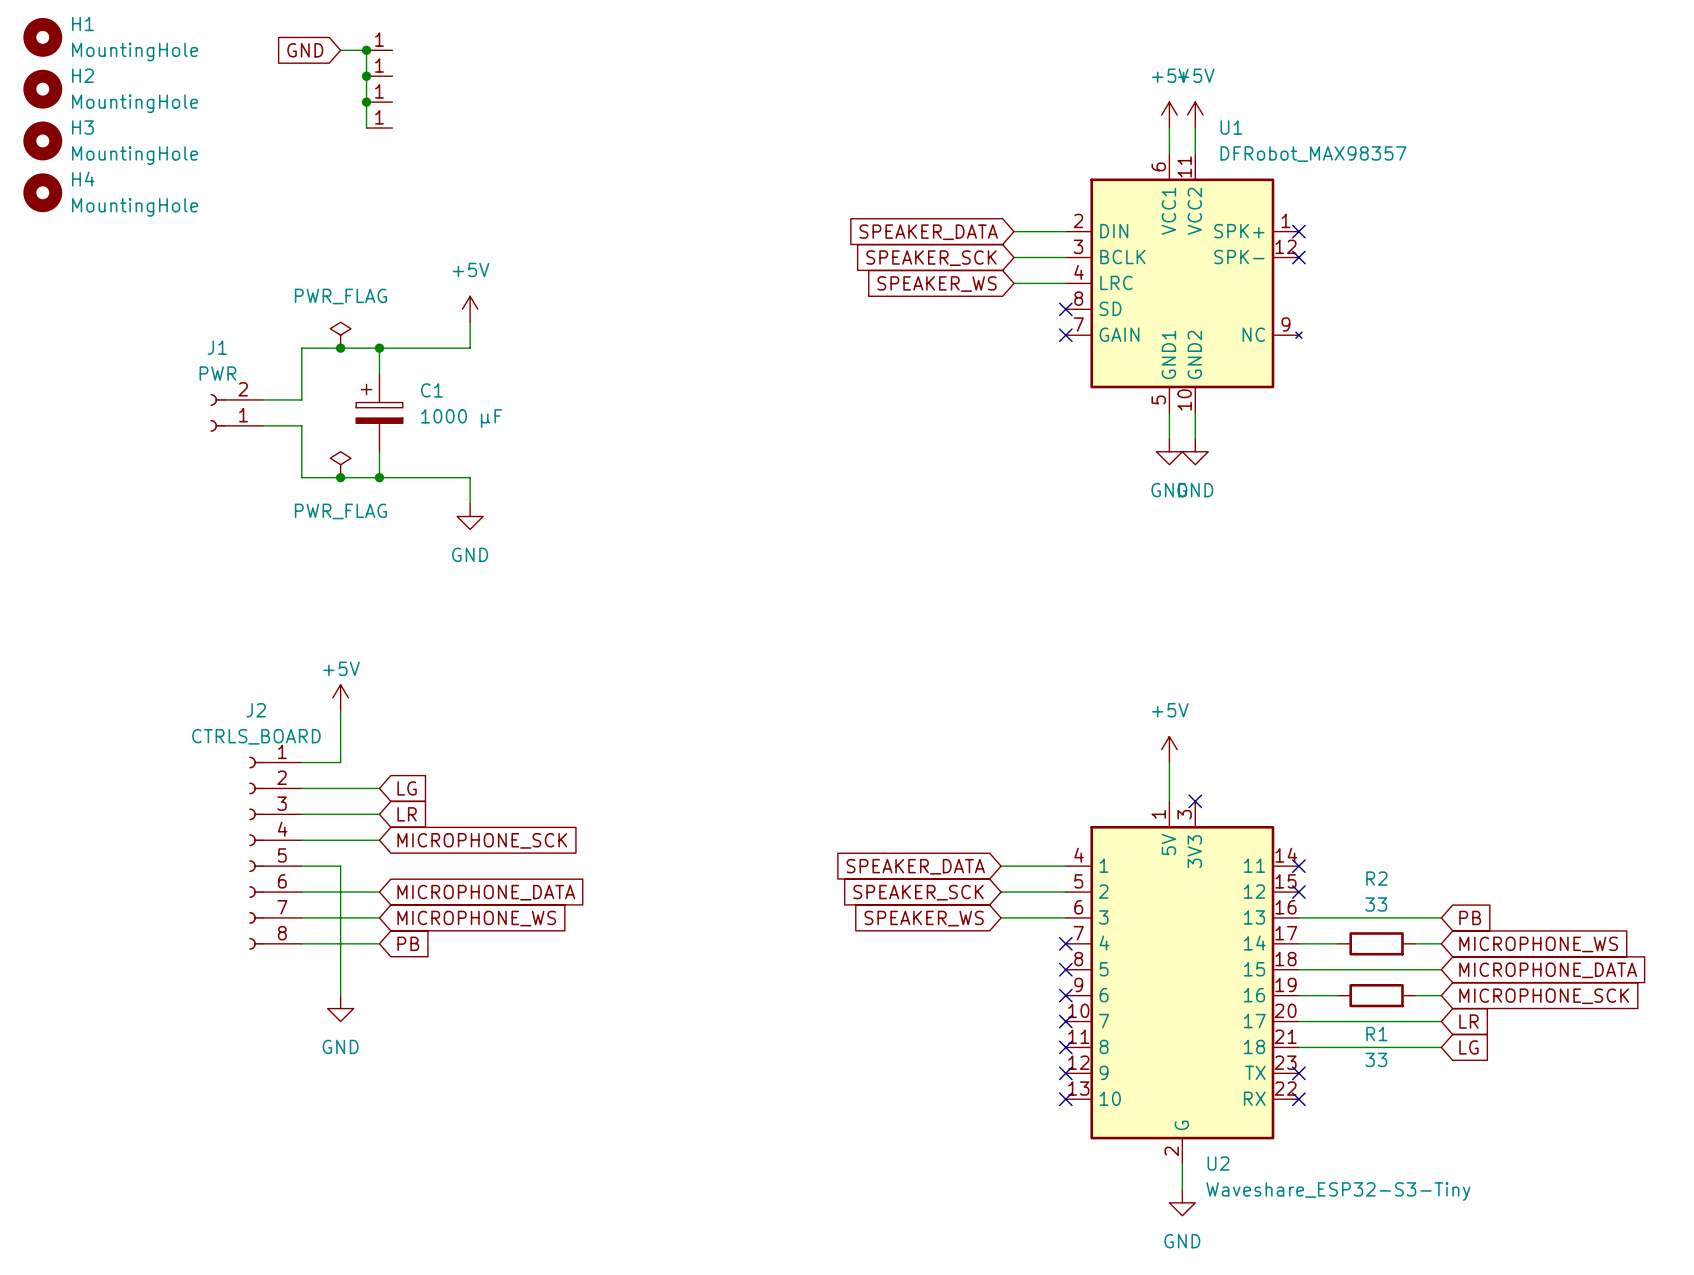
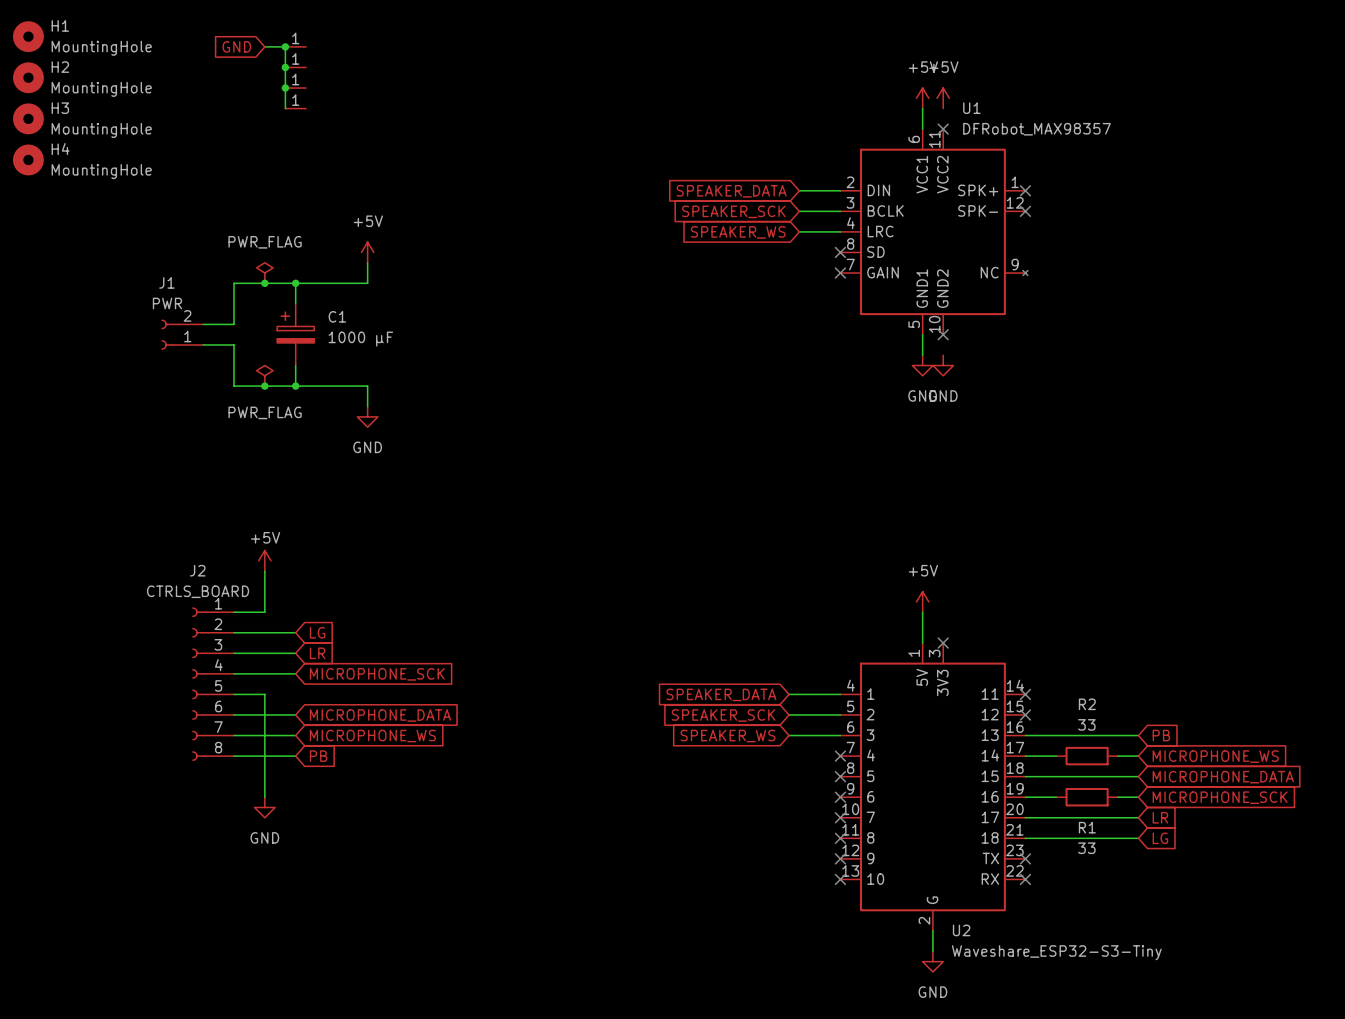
wire: (1195, 128) (1195, 153) -> none
no-connect mark: none -> (943, 129)
wire: (1195, 412) (1195, 438) -> none
no-connect mark: none -> (943, 334)

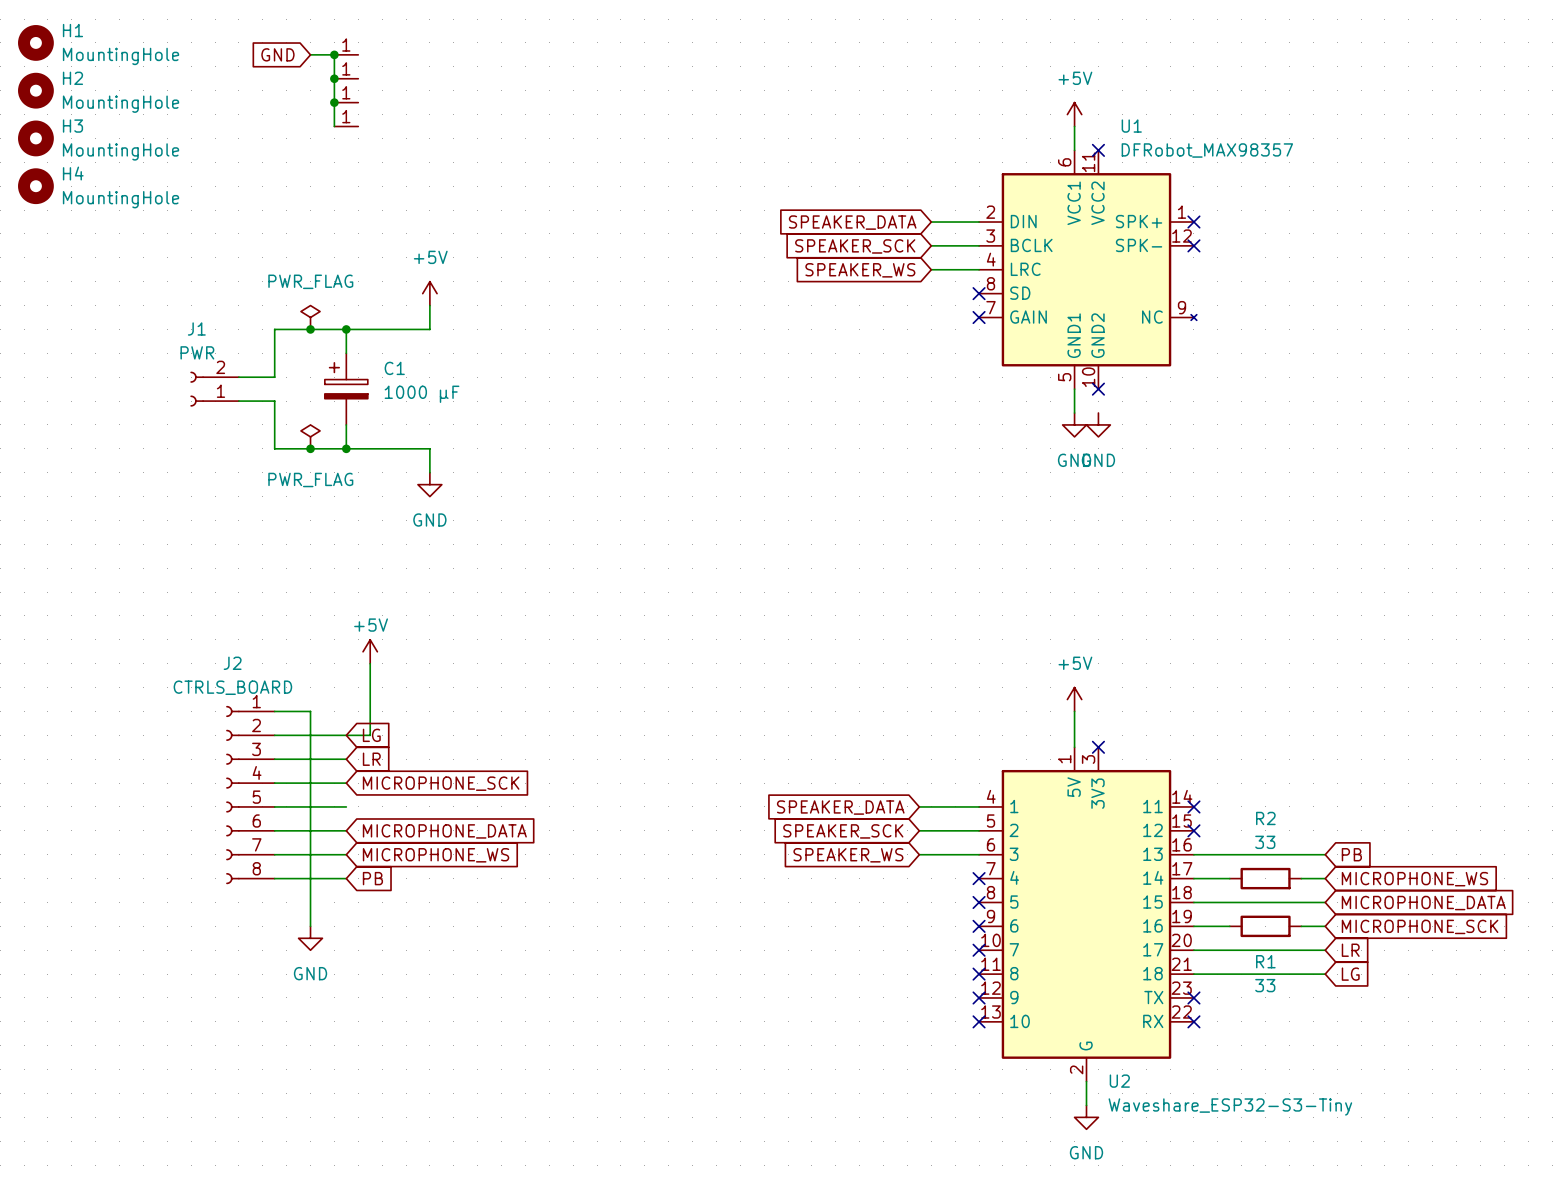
power symbol: +5V (943, 98) -> none
power symbol position: +5V (264, 560) -> +5V (370, 651)
wire: (264, 571) (264, 612) -> (346, 806) (310, 806) (310, 711)
wire: none -> (370, 663) (370, 735) (346, 735)

